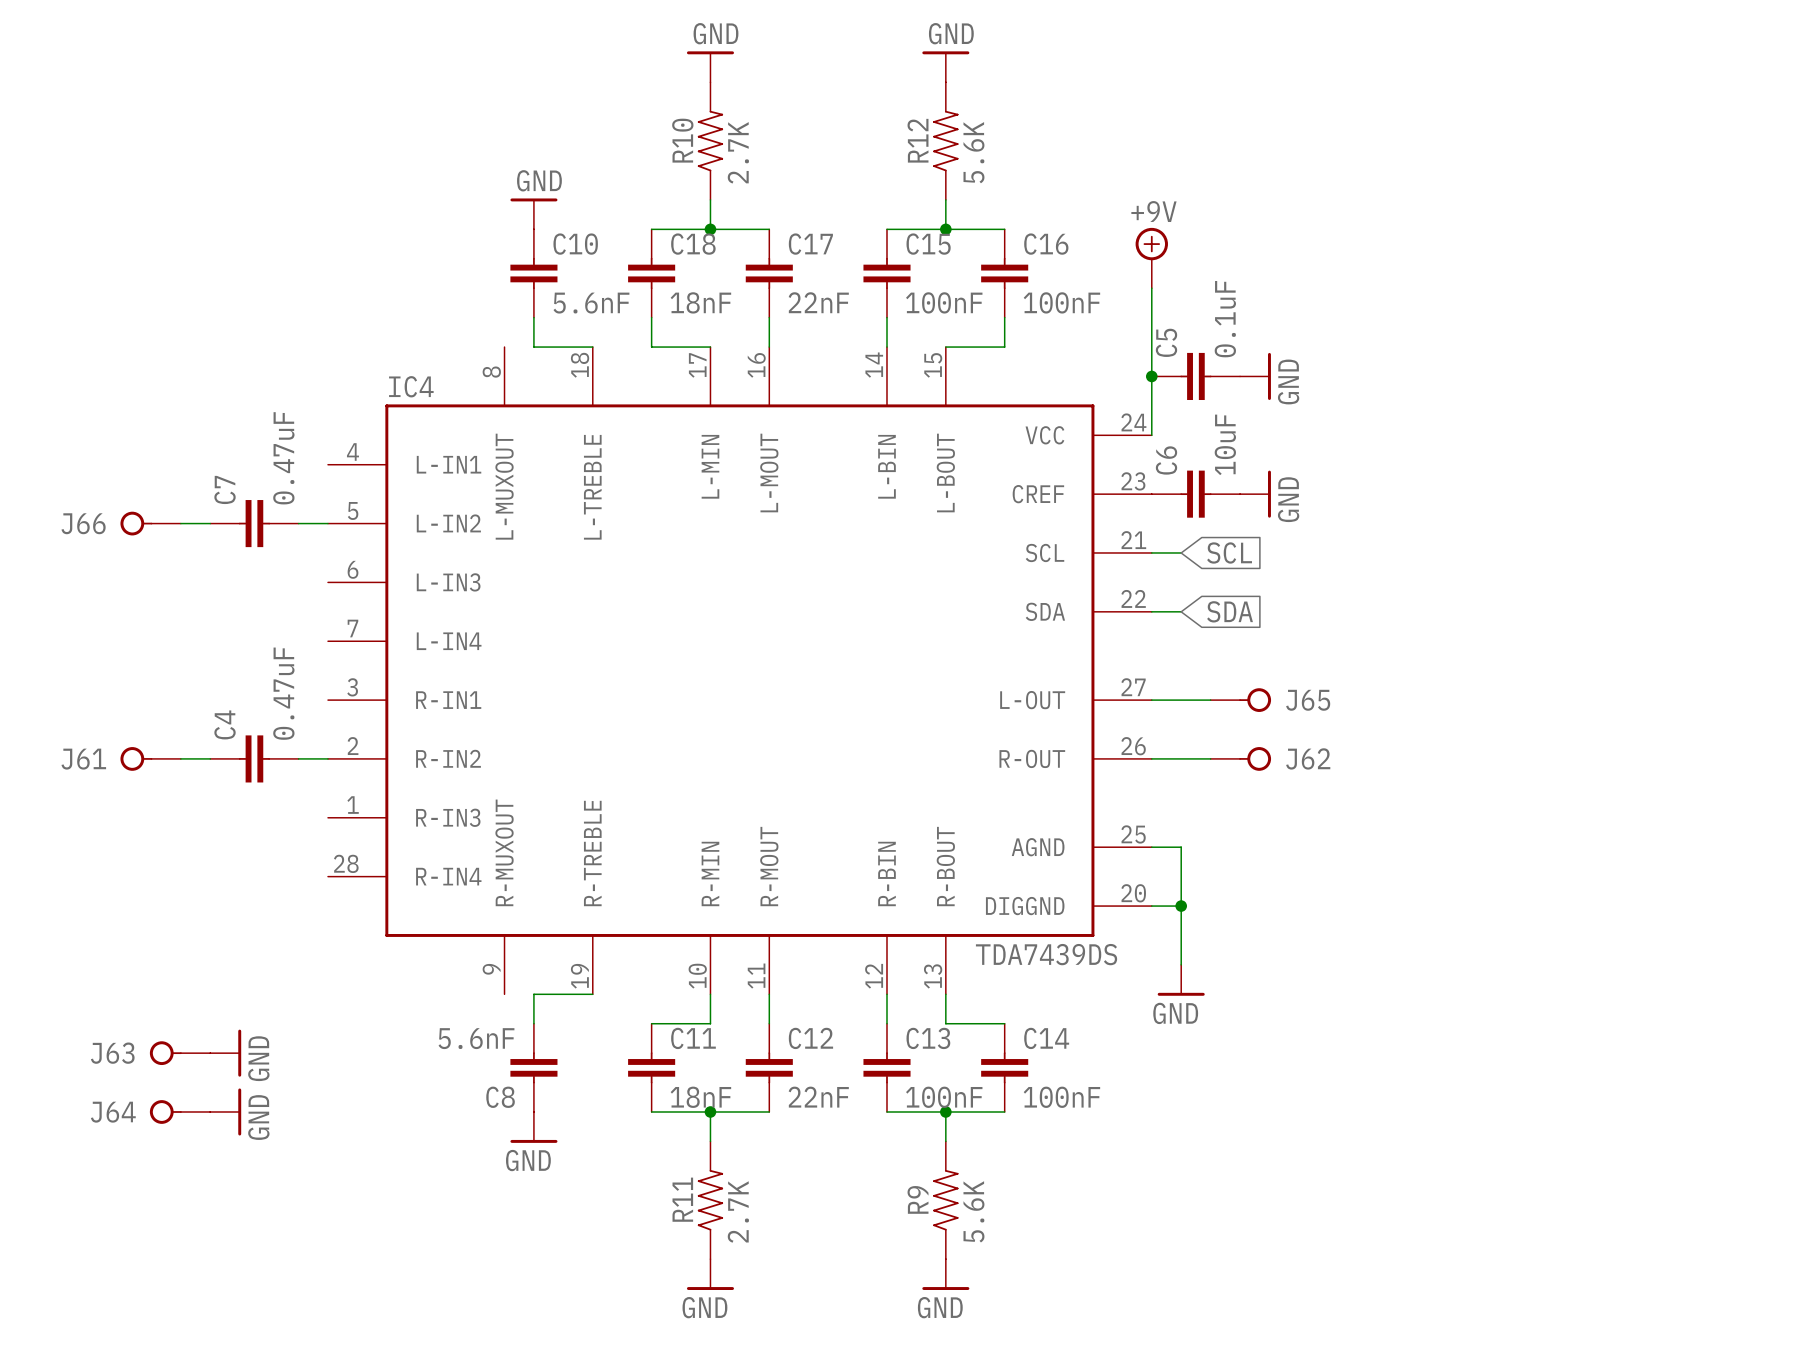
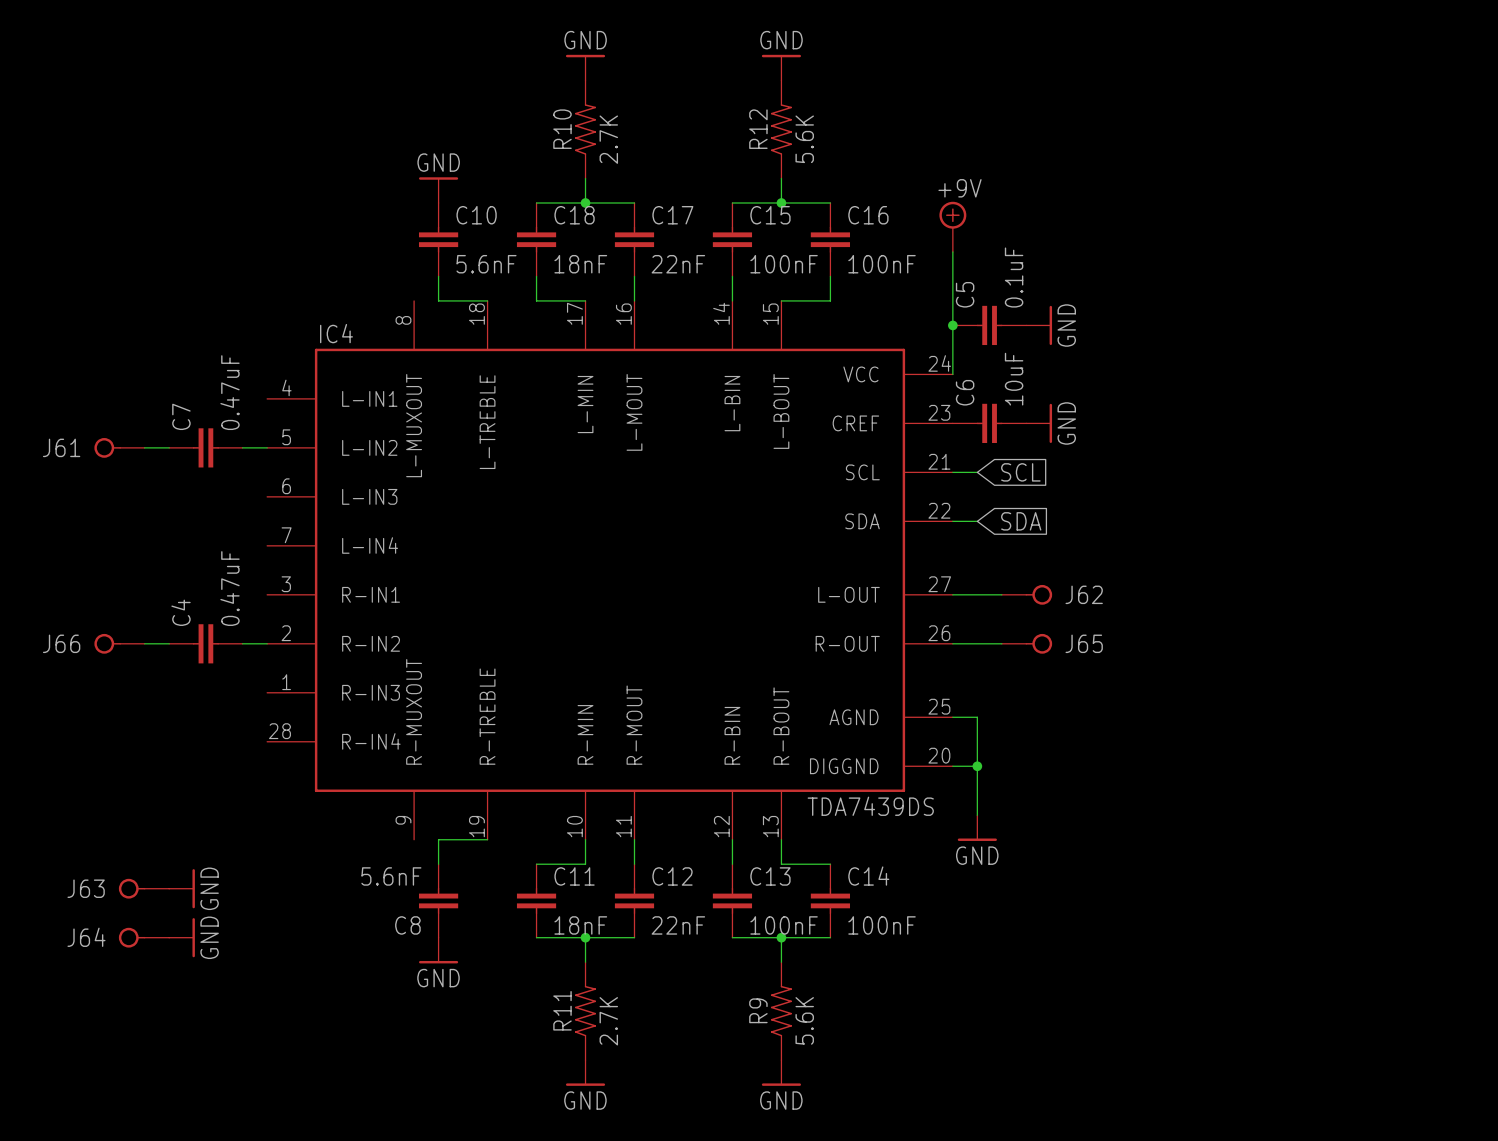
J66 name: J66 (83, 523) -> J61 (61, 447)
J65 name: J65 (1308, 700) -> J62 (1084, 594)
J62 name: J62 (1308, 758) -> J65 (1084, 643)
J61 name: J61 (83, 759) -> J66 (61, 643)

